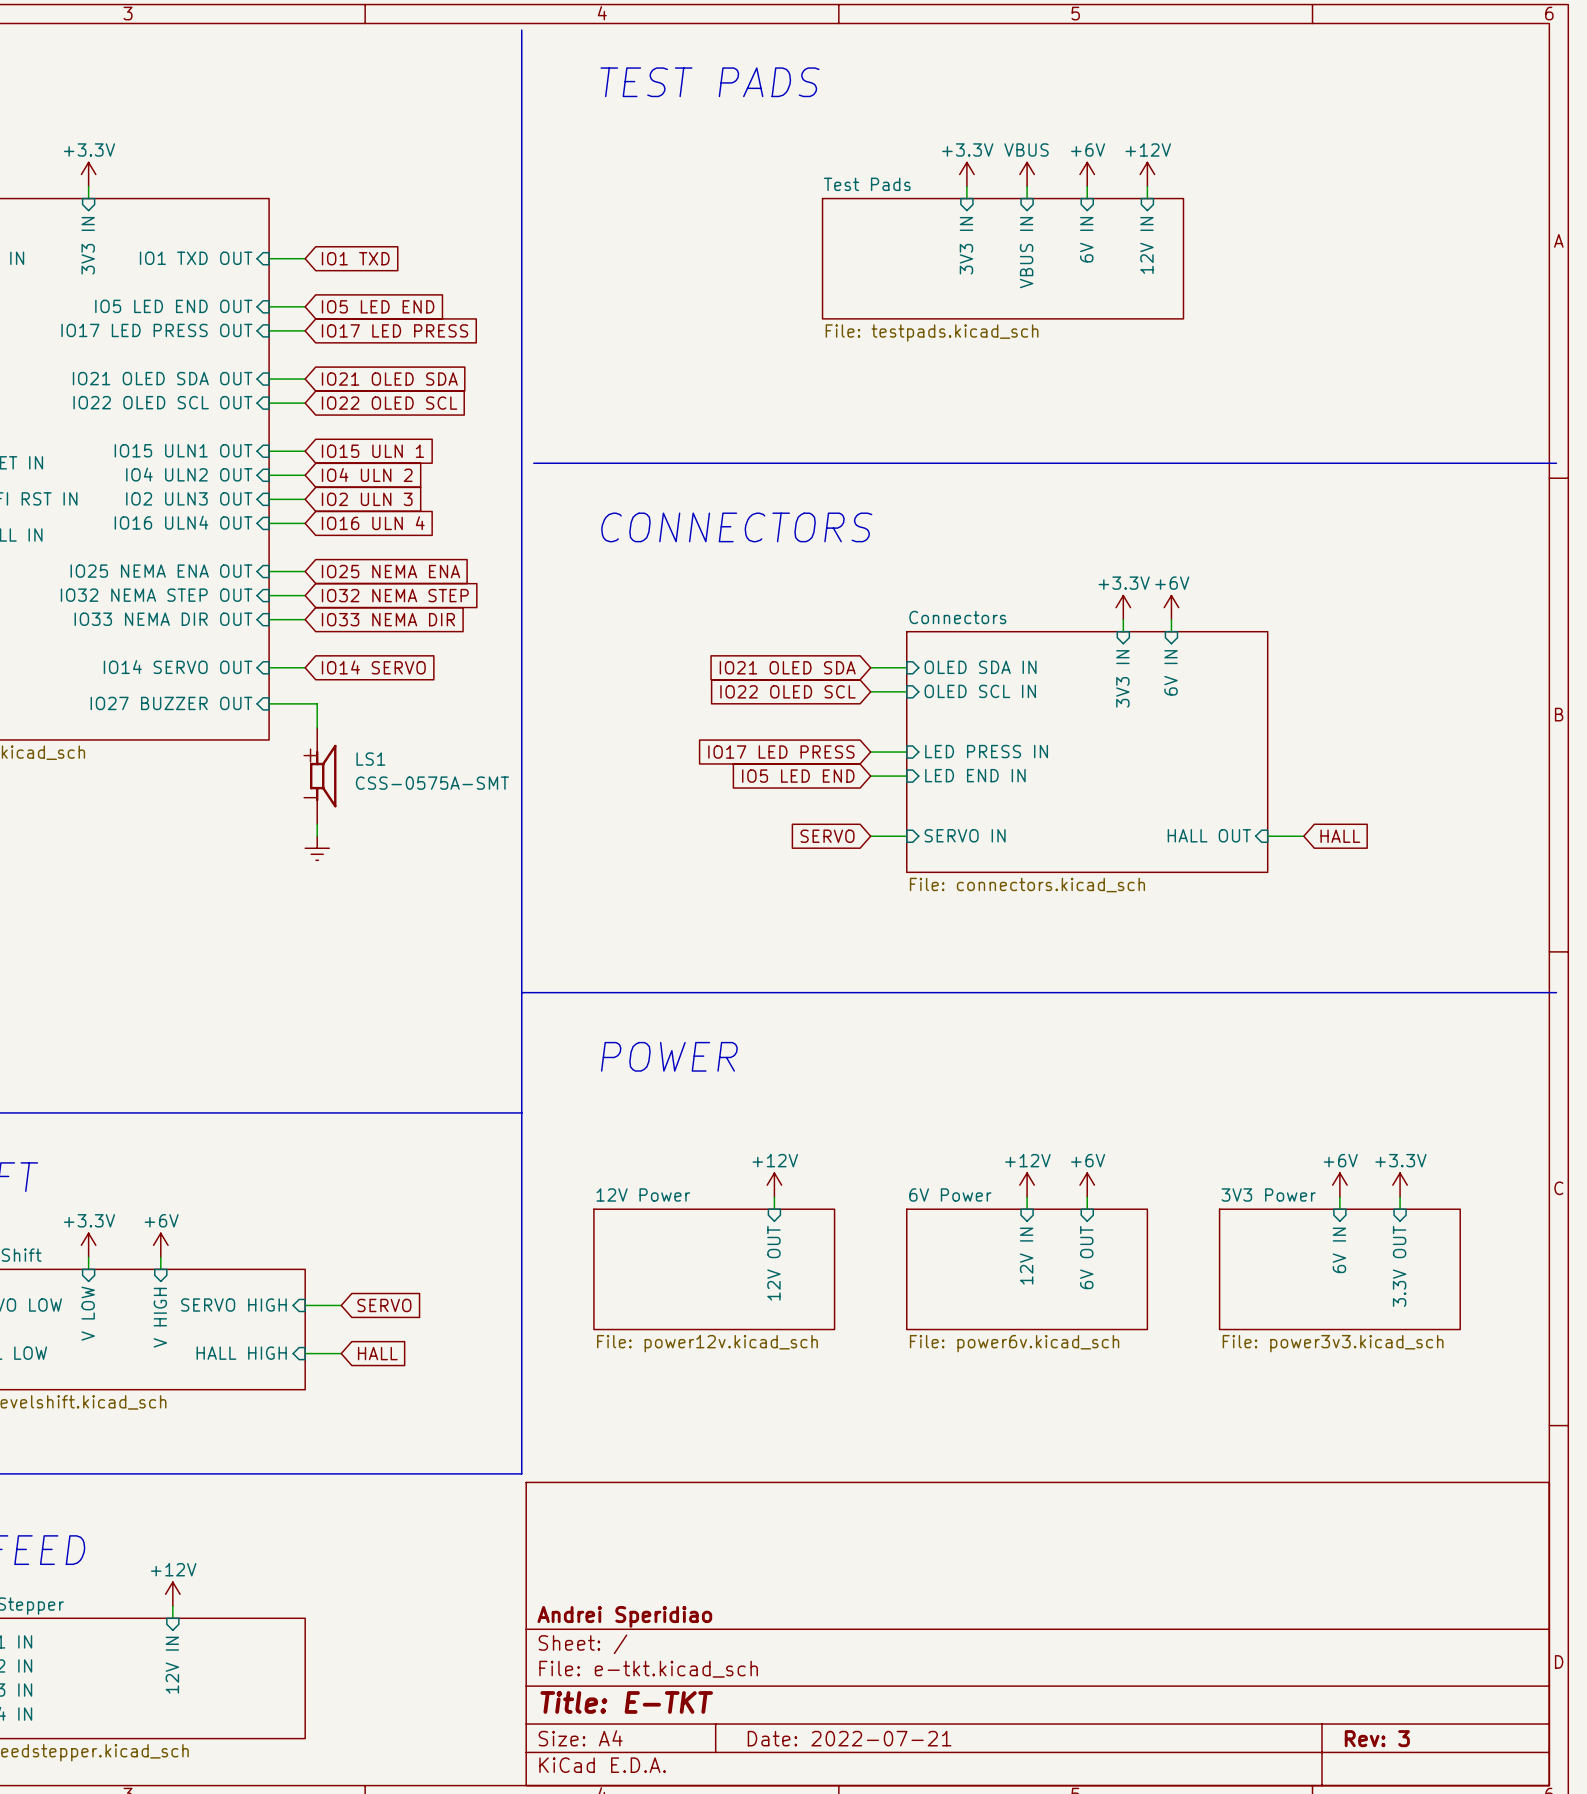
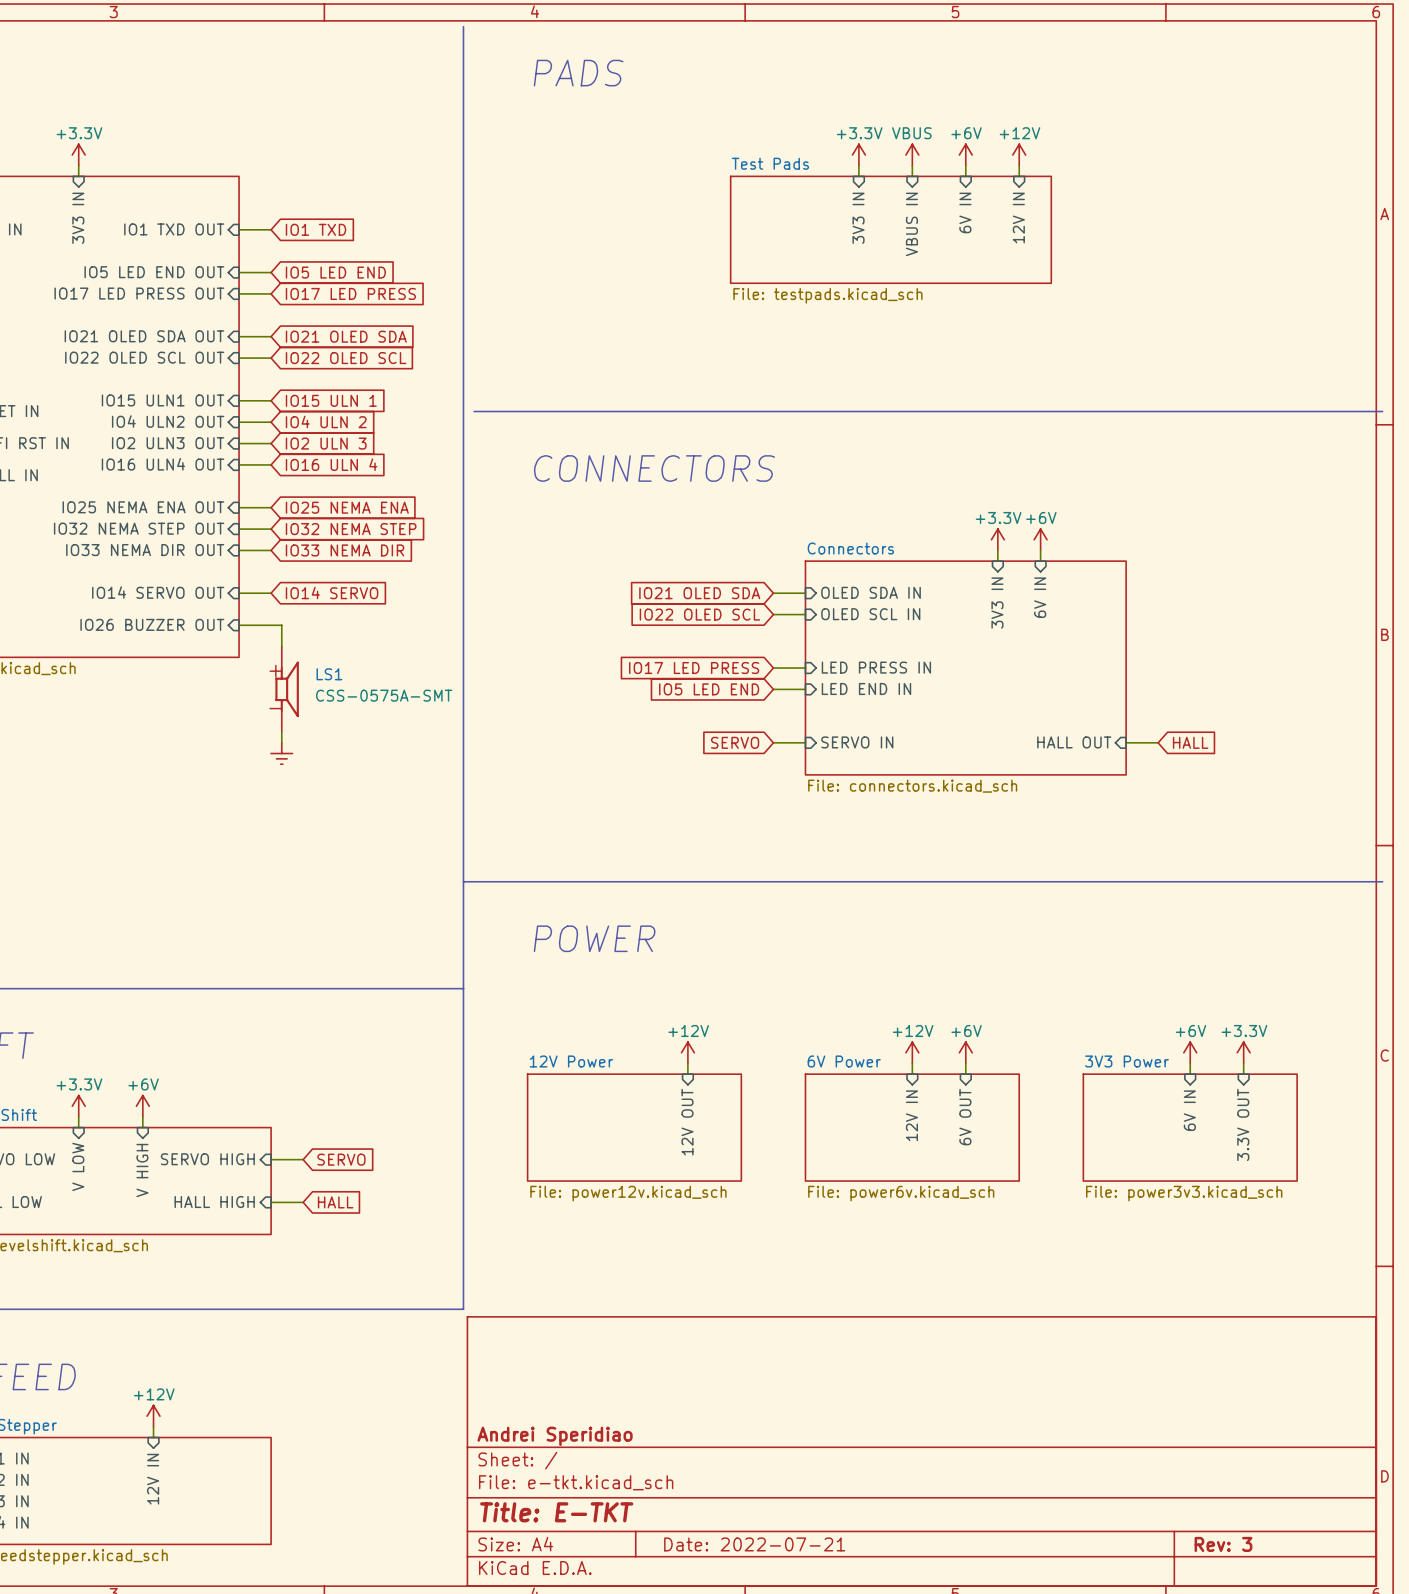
text: TEST PADS (710, 82) -> PADS (578, 73)
sheet pin: IO27 BUZZER OUT (171, 703) -> IO26 BUZZER OUT (152, 624)

